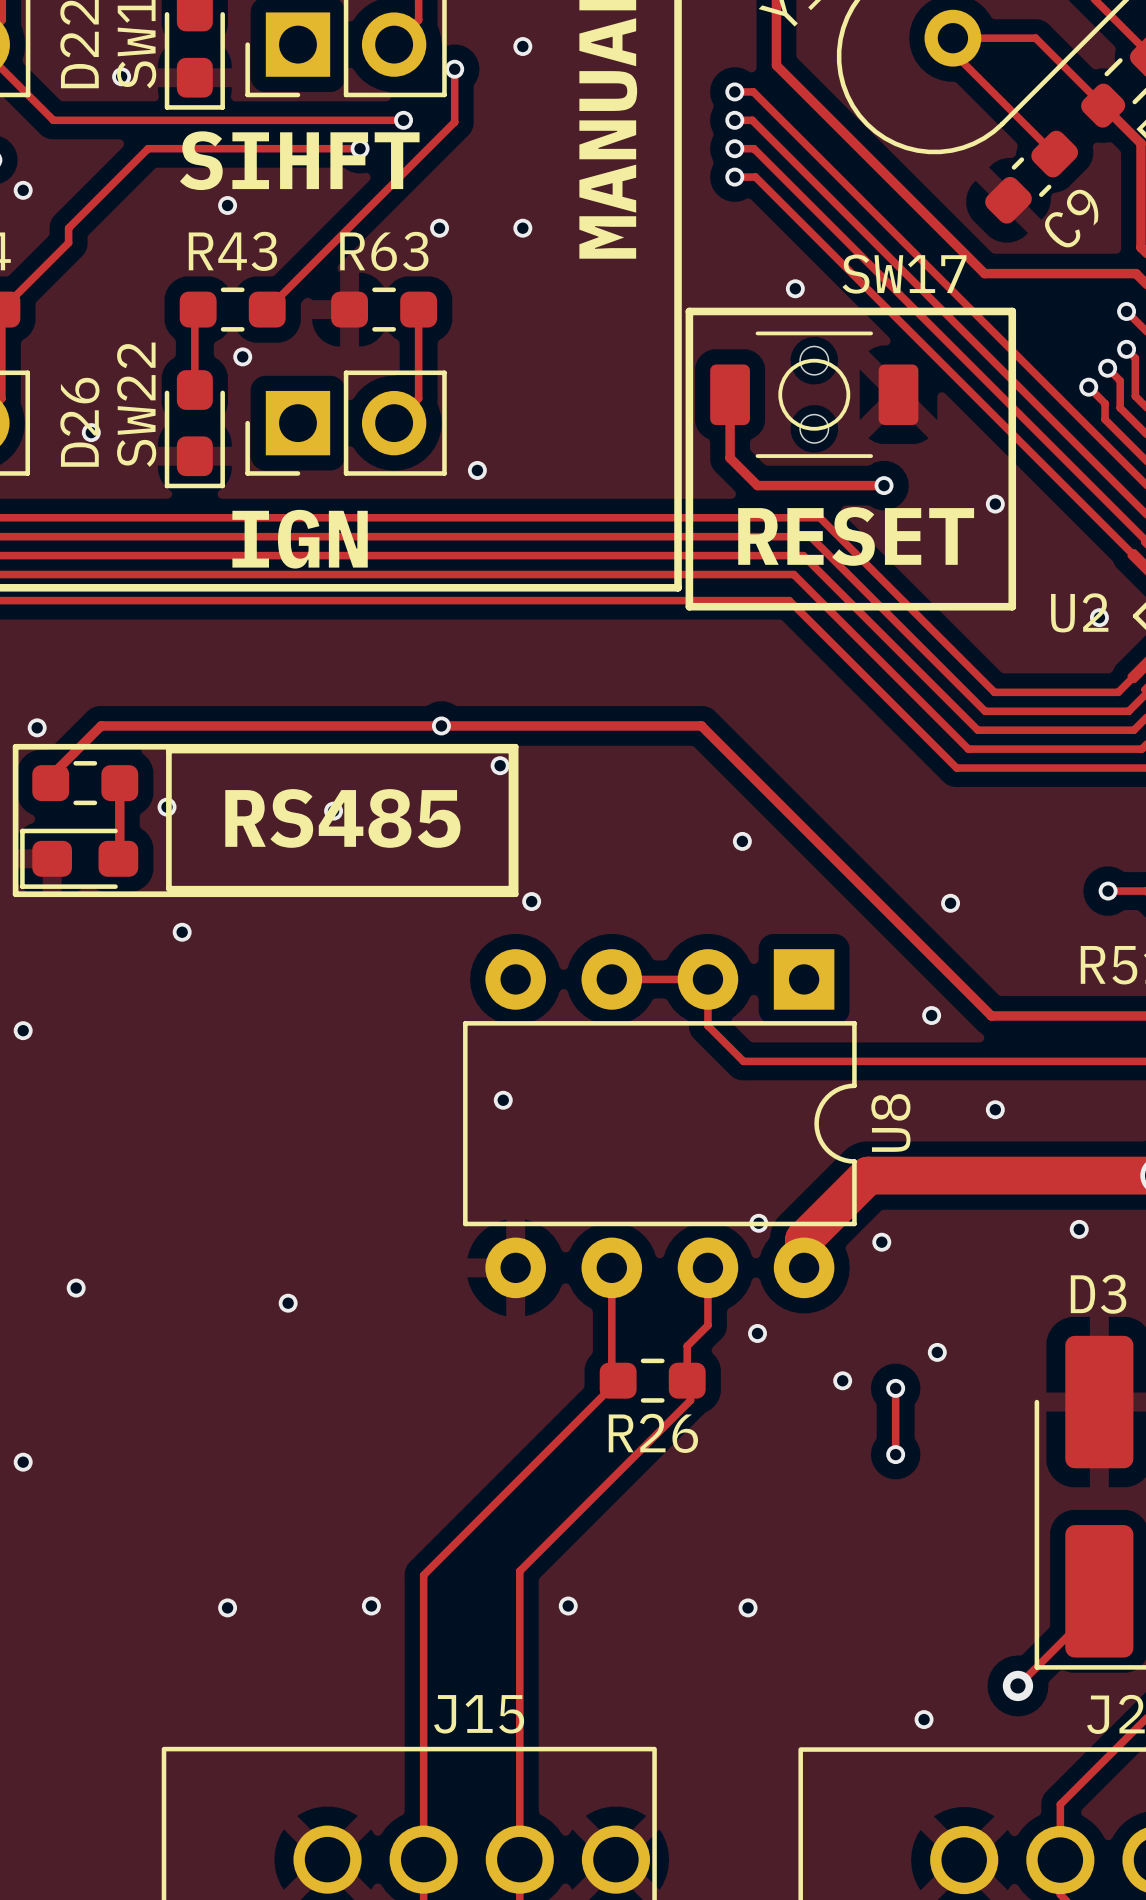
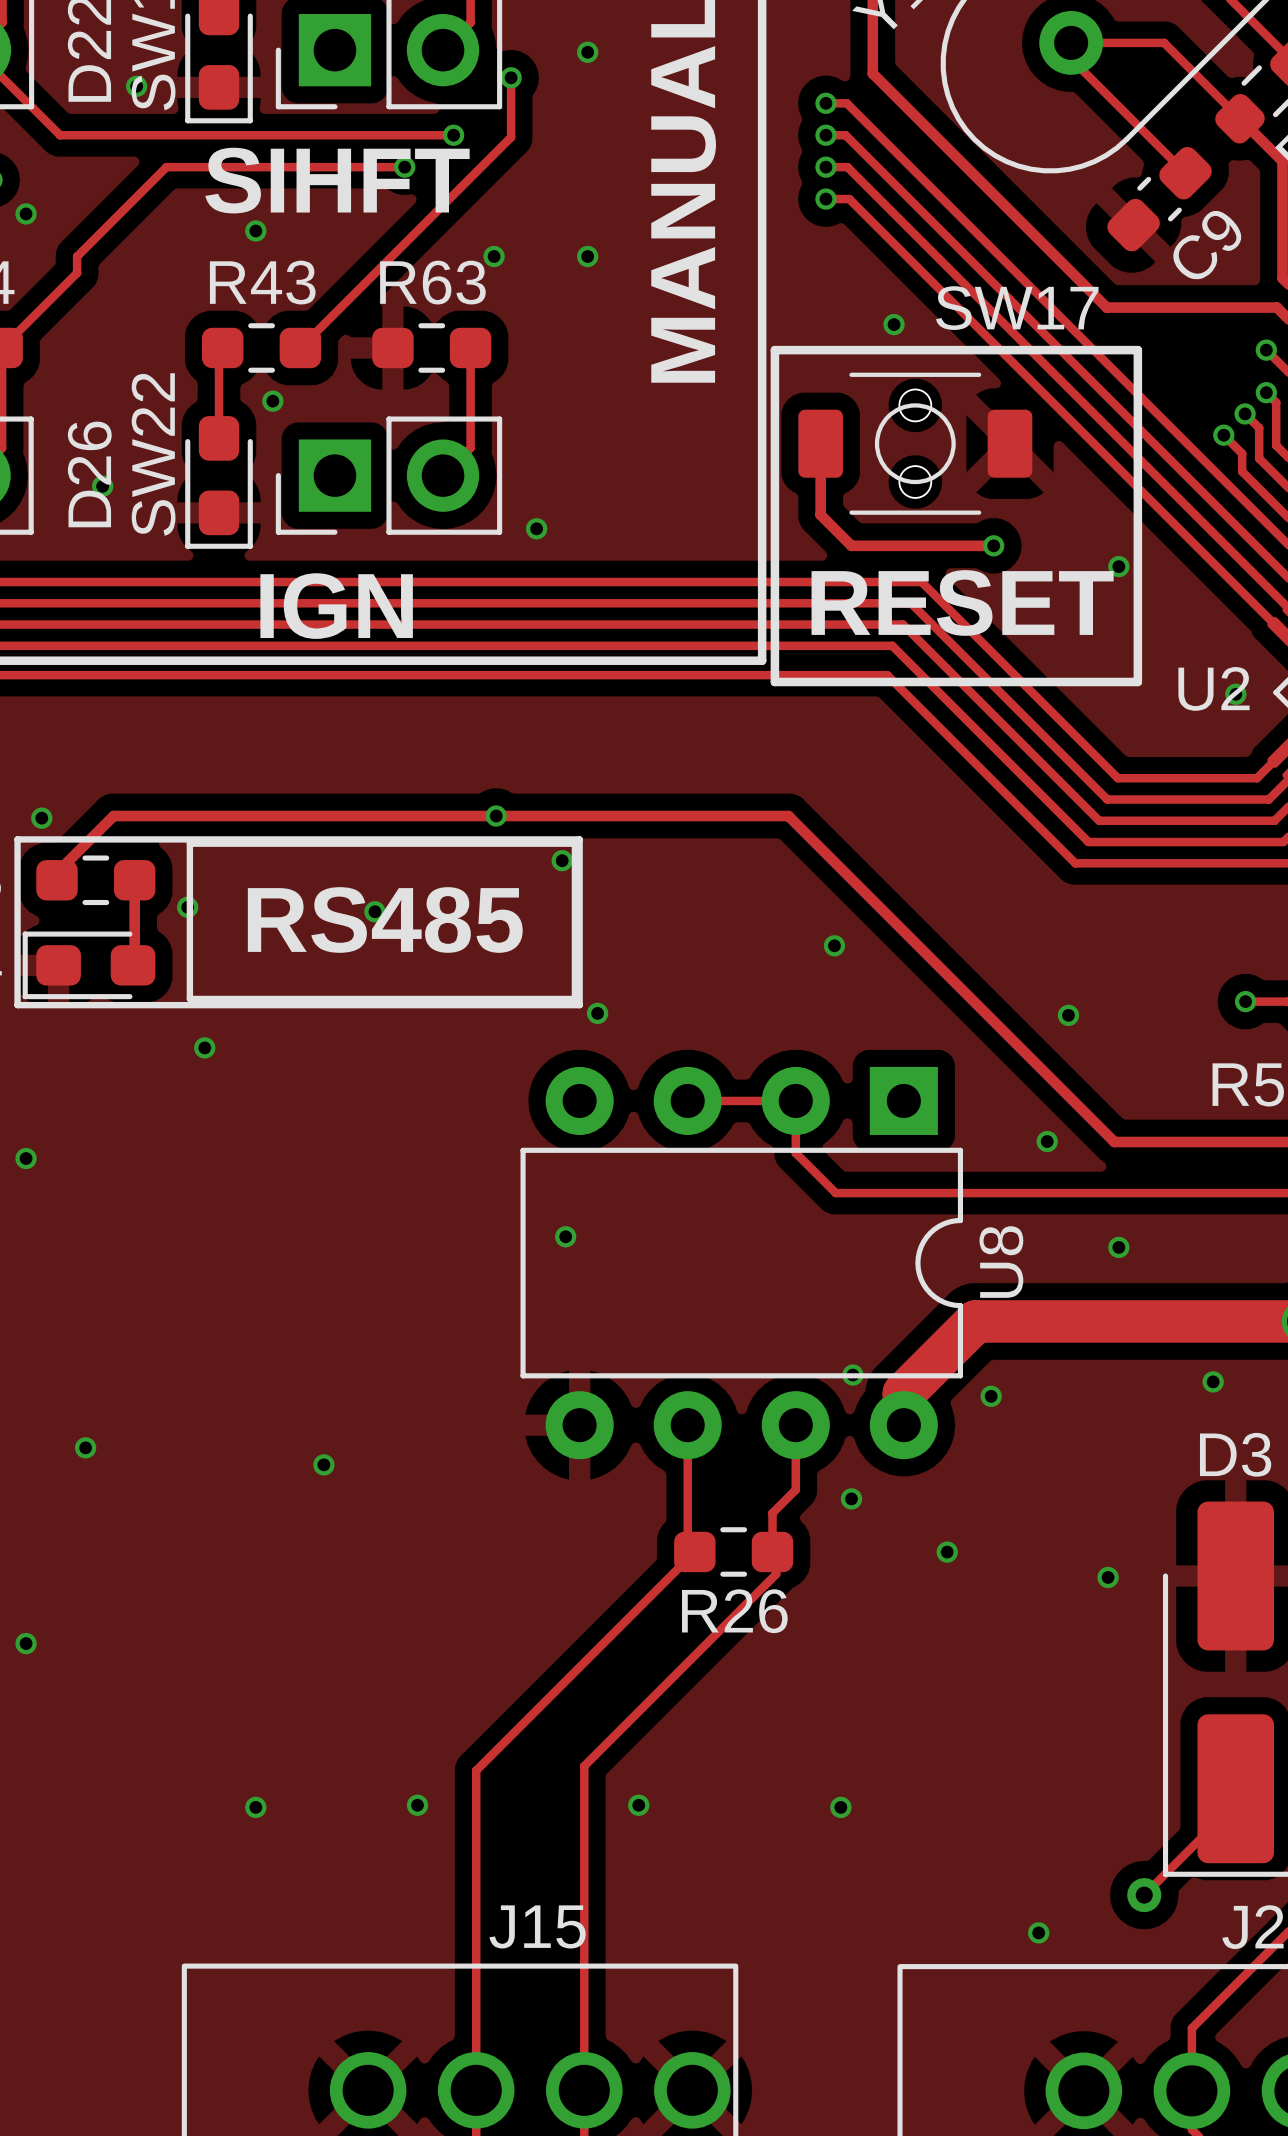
via: (937, 1352) -> none
track: (895, 1388) (895, 1454) -> none
via: (895, 1388) -> none
via: none -> (1108, 1577)
via: (895, 1454) -> none

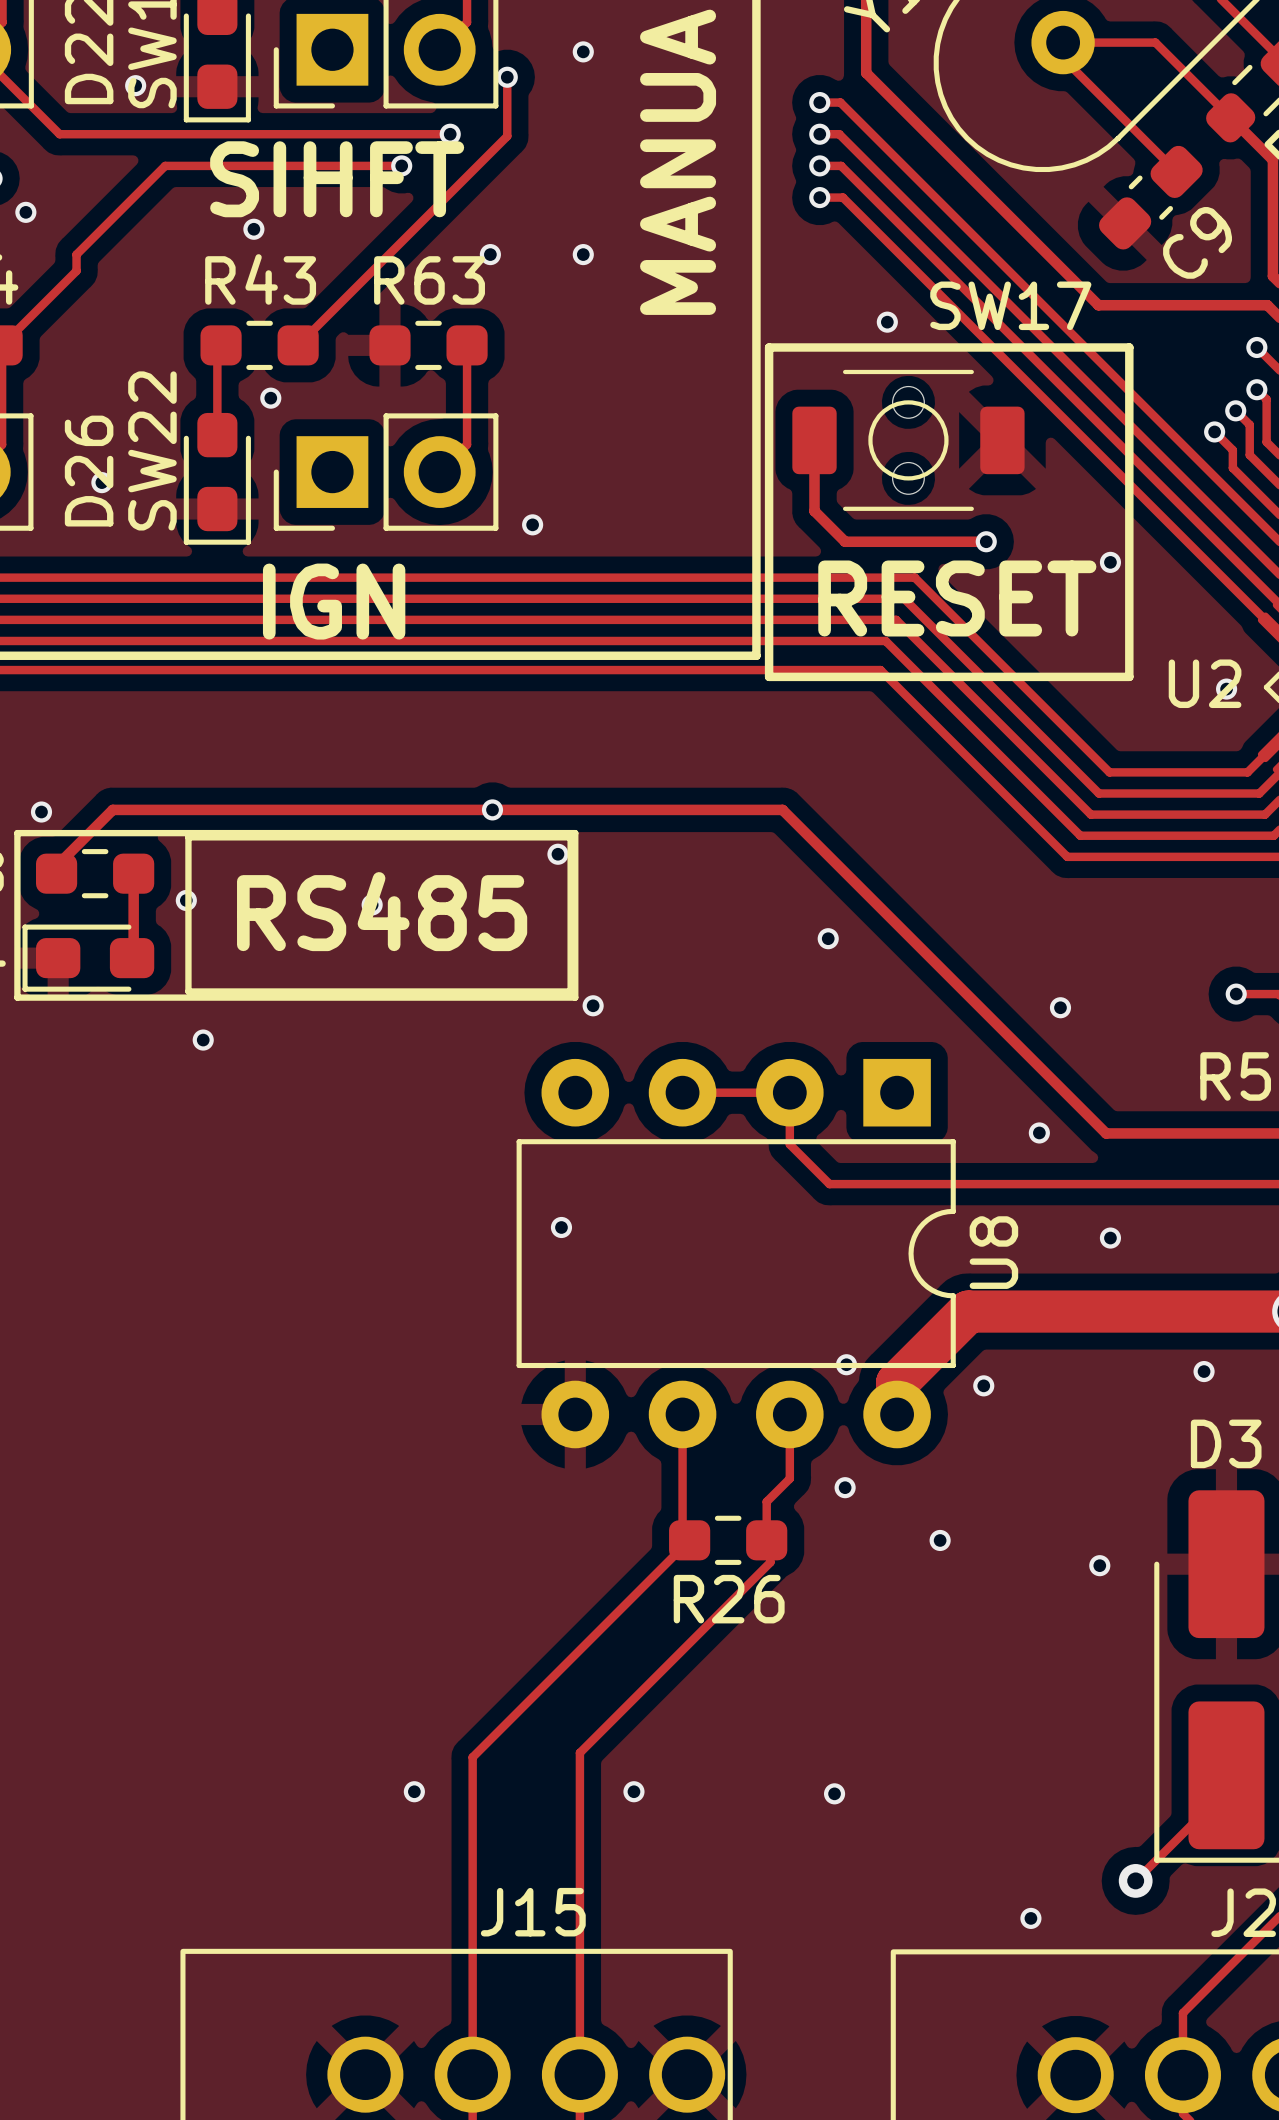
via: (26, 1158) -> none
via: (85, 1447) -> none
via: (323, 1464) -> none
via: (26, 1643) -> none
via: (255, 1807) -> none

